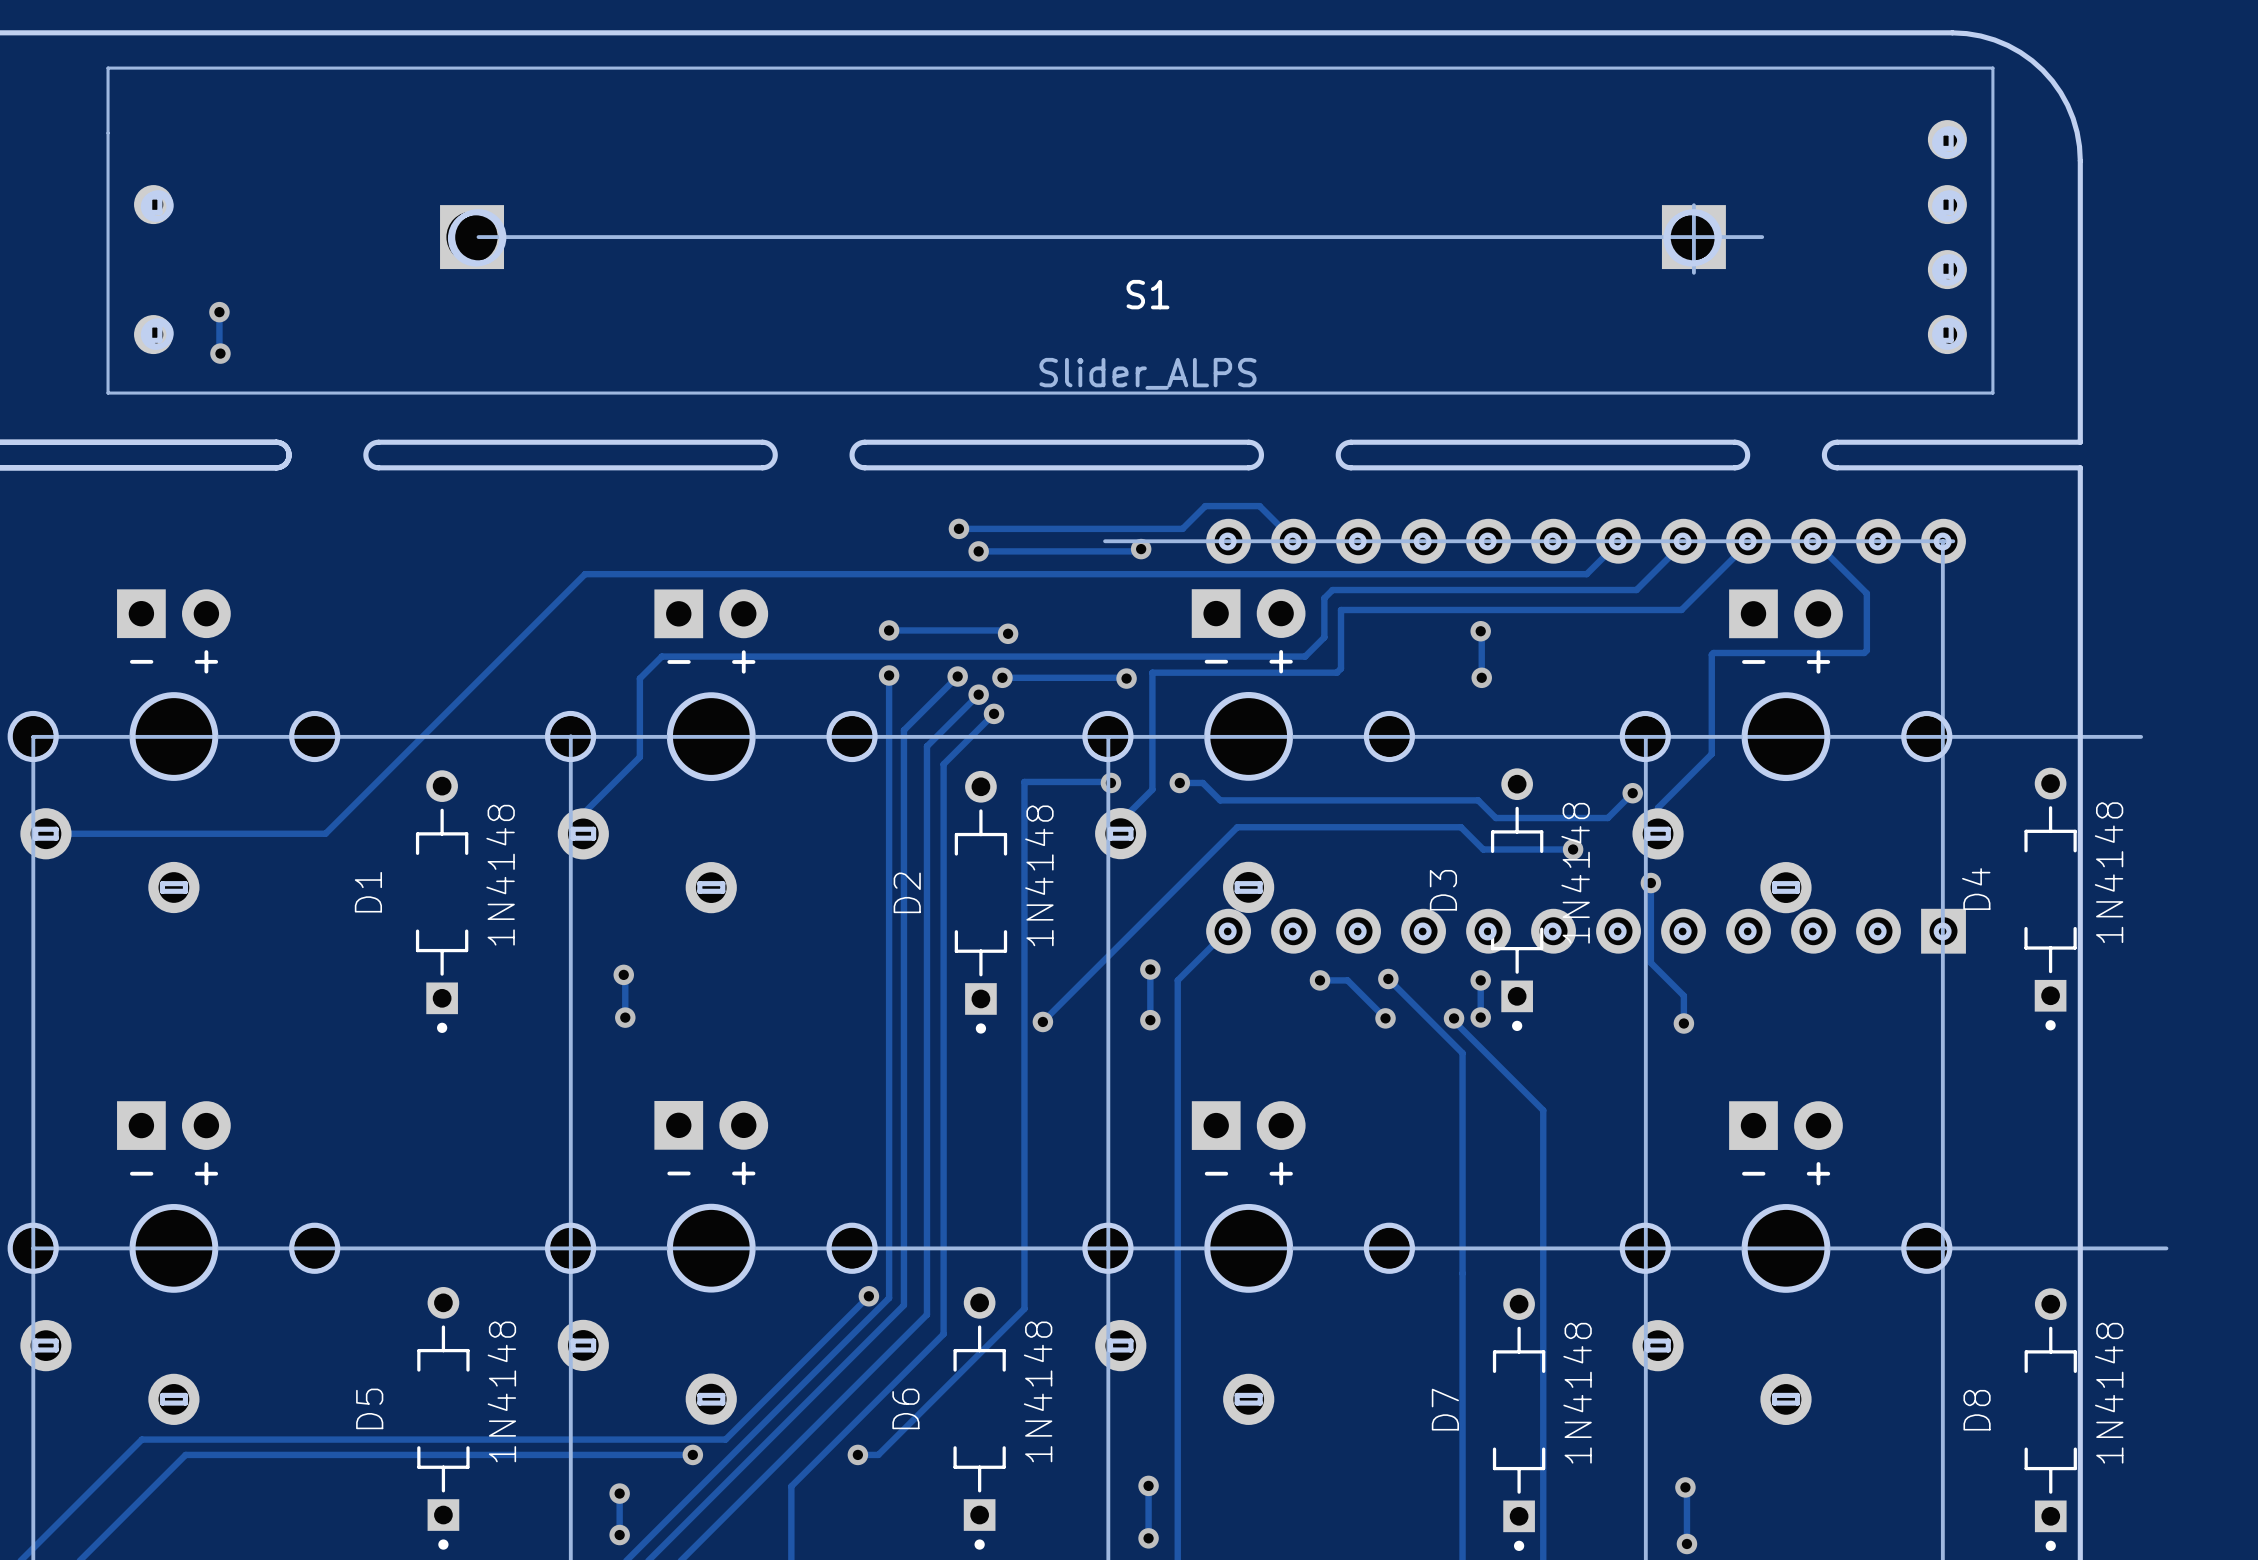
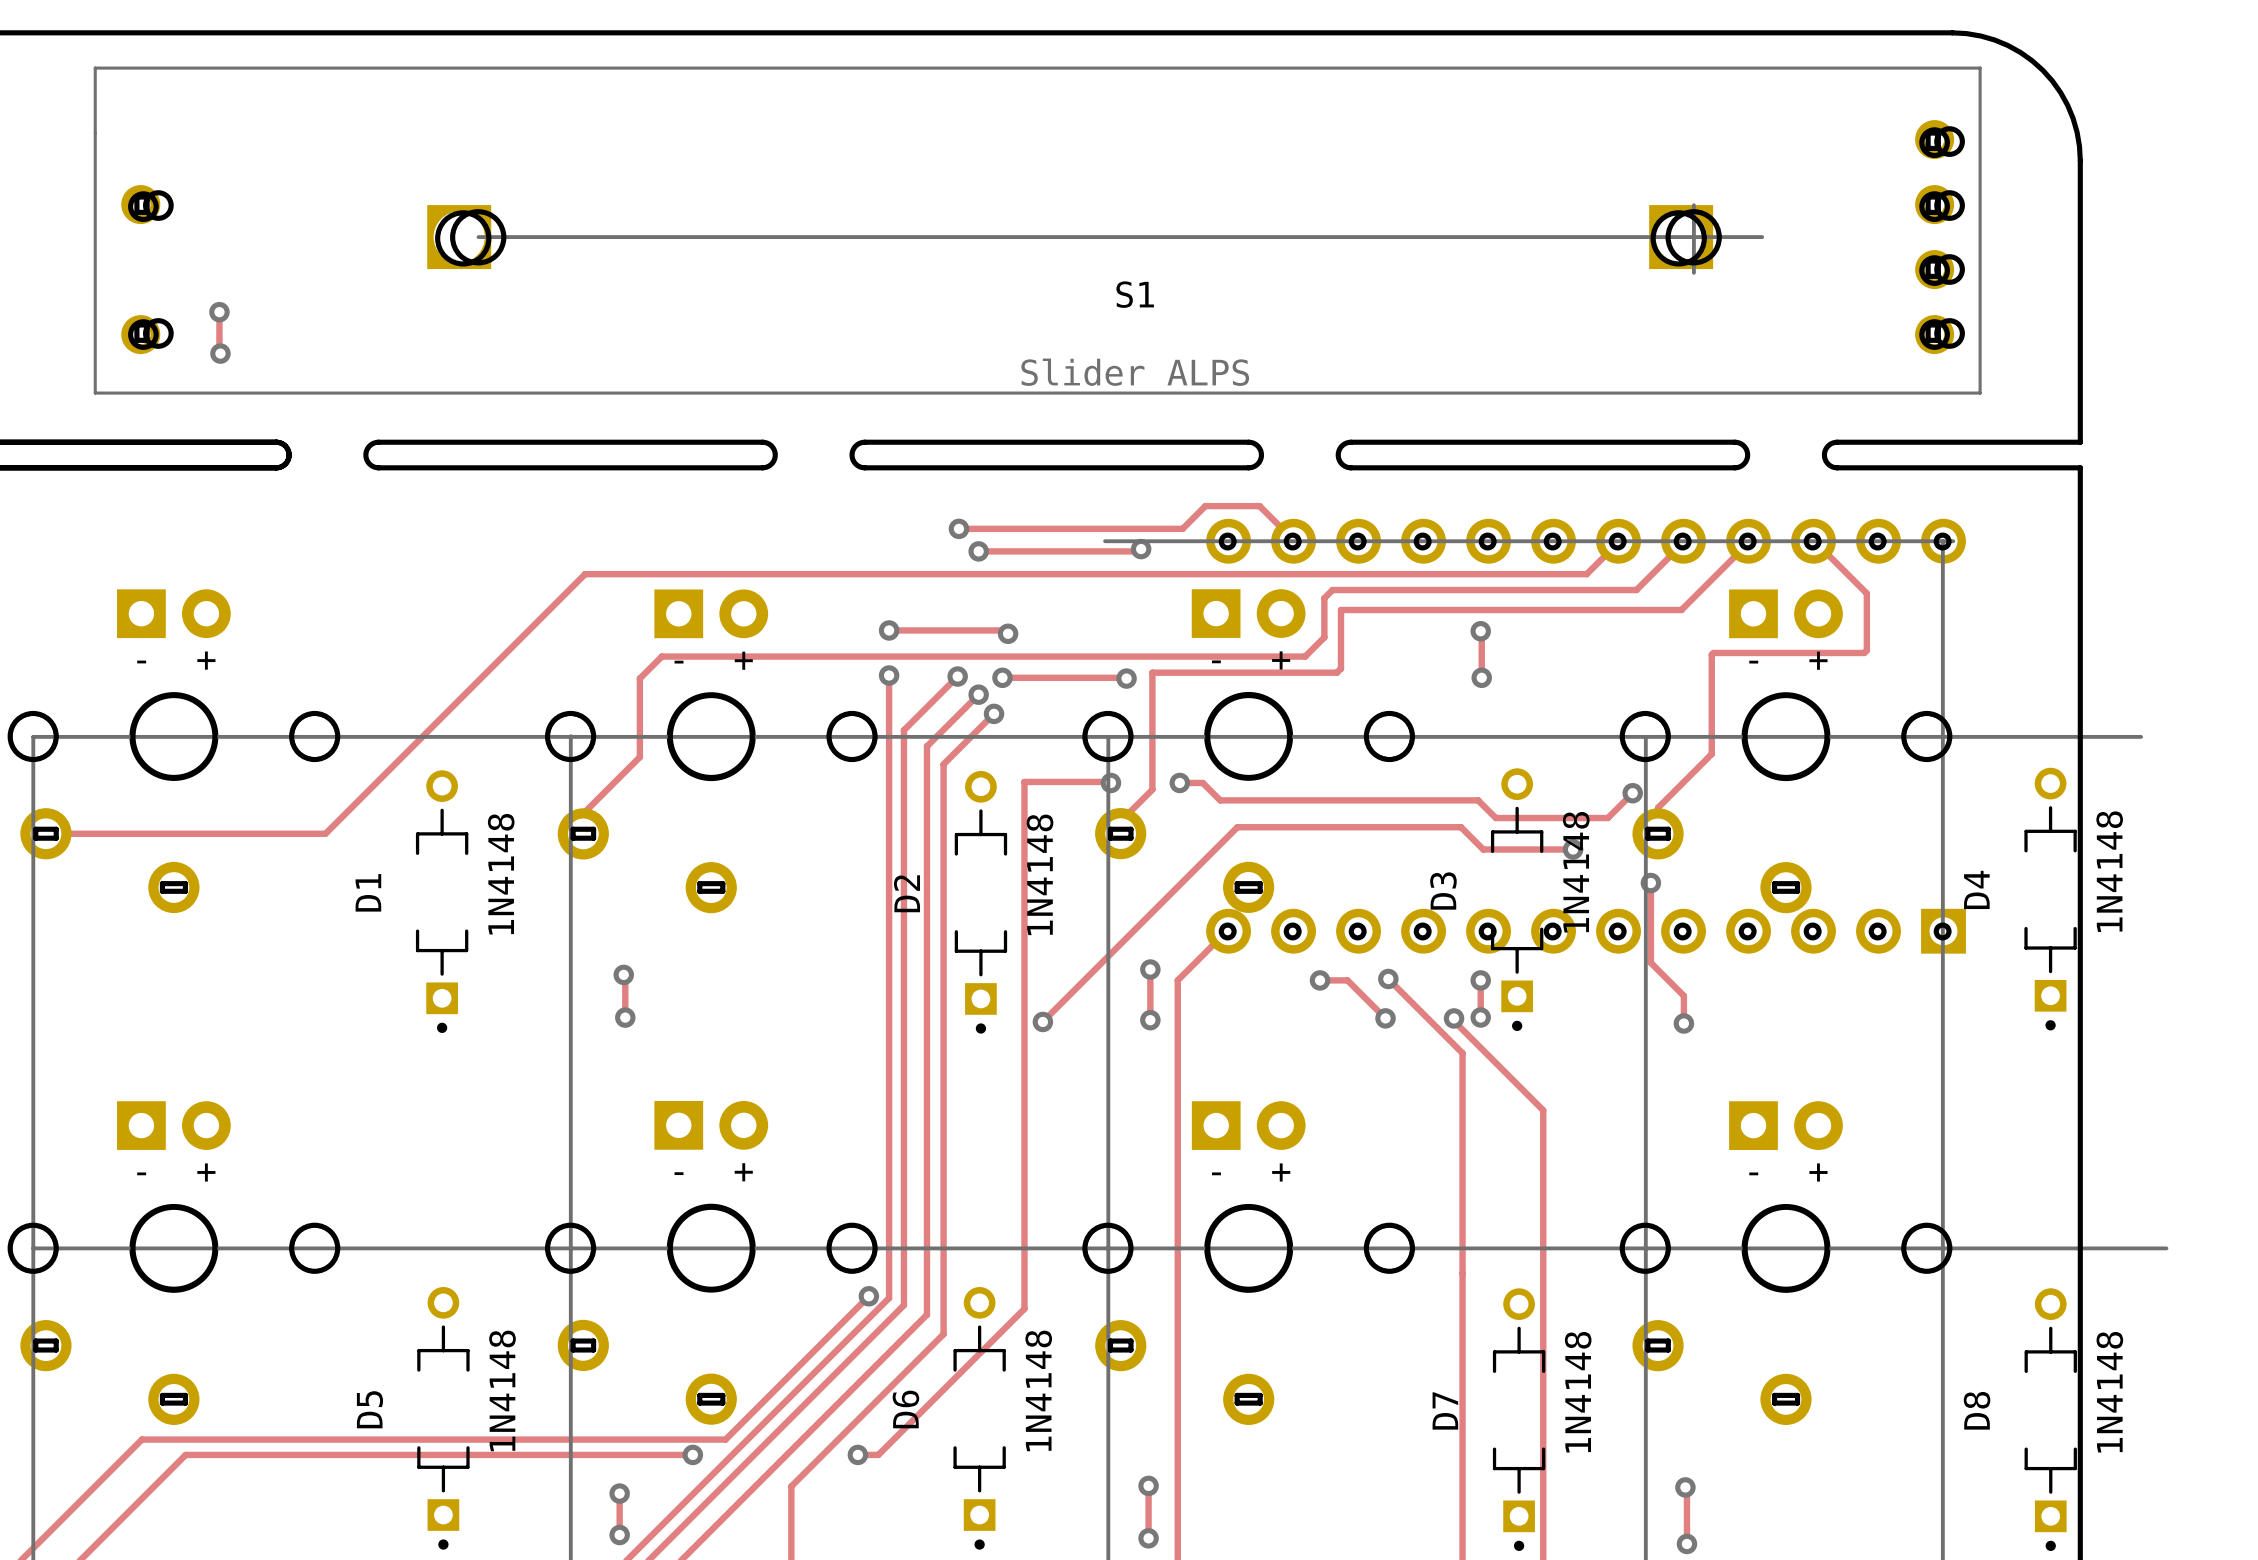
S1 position: (1050, 230) -> (1037, 230)

